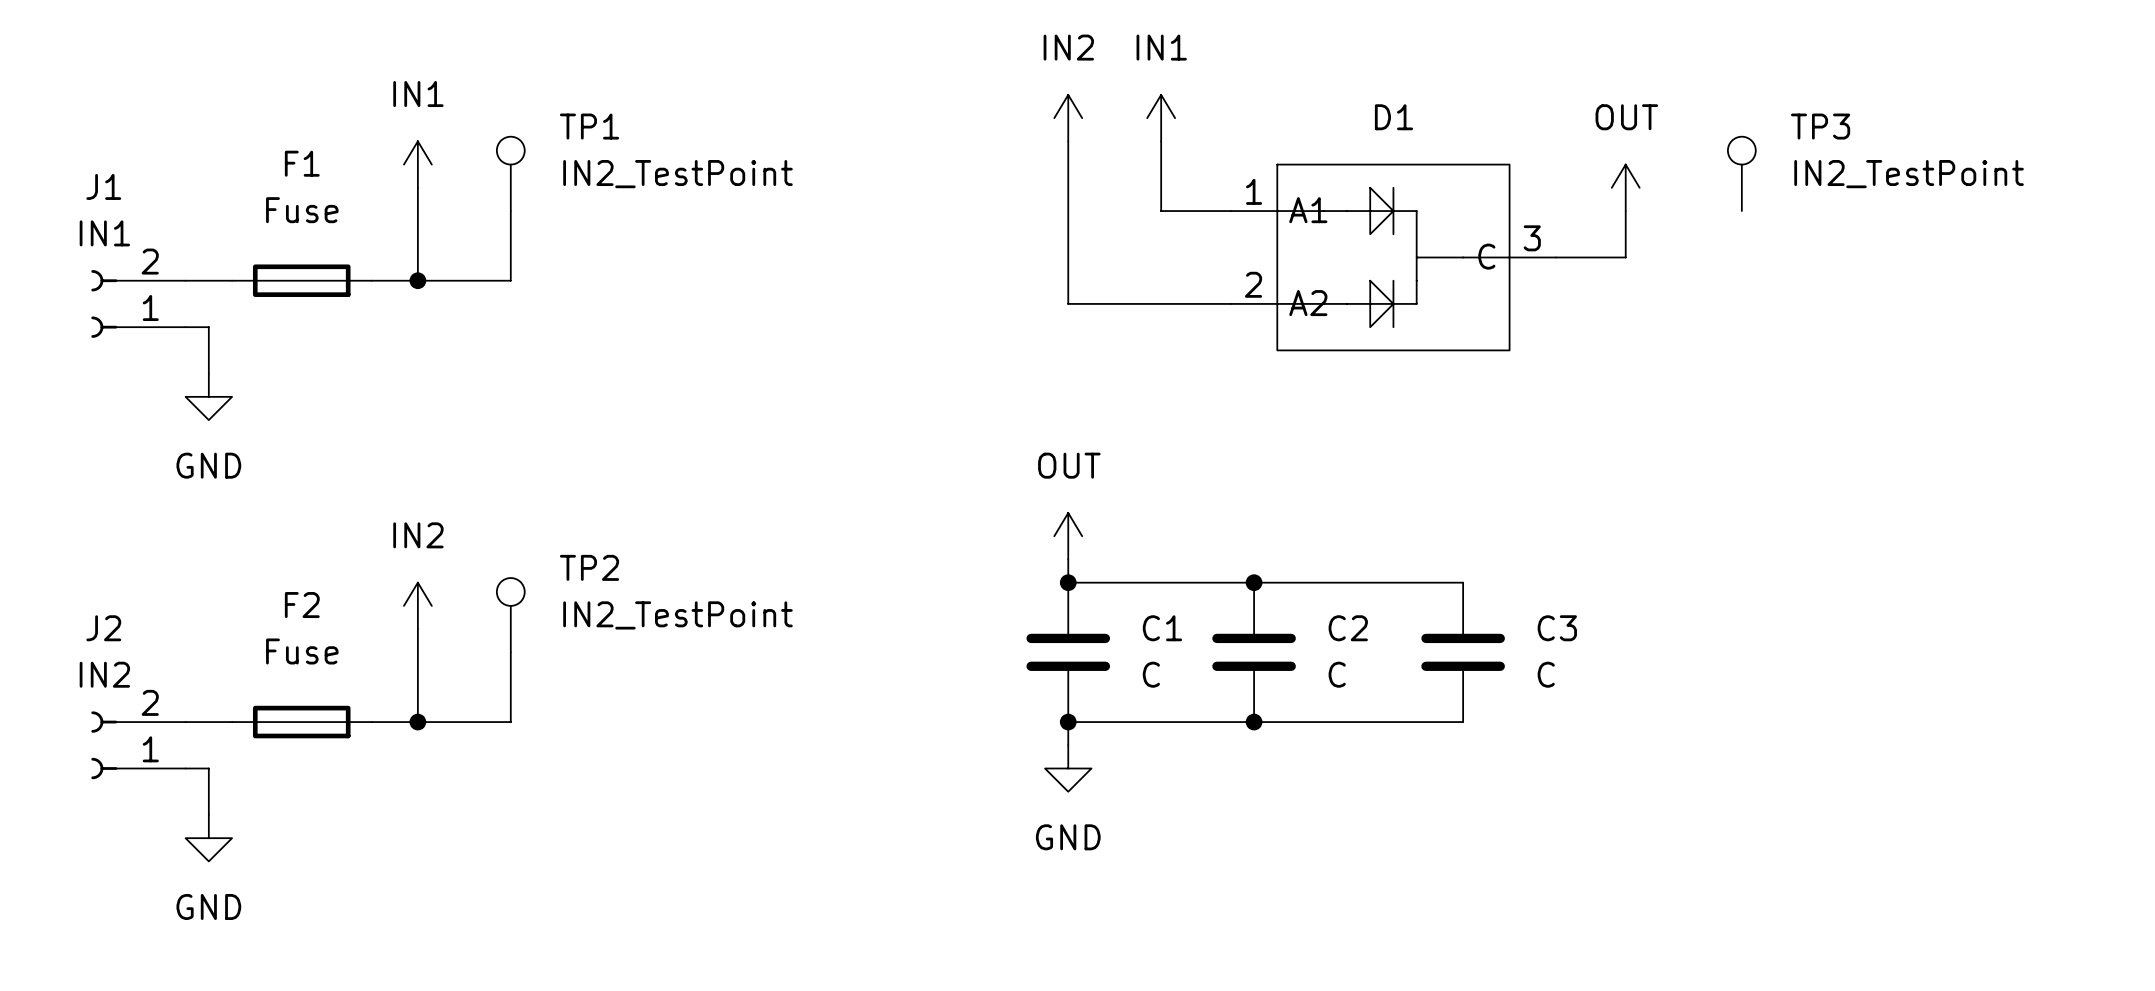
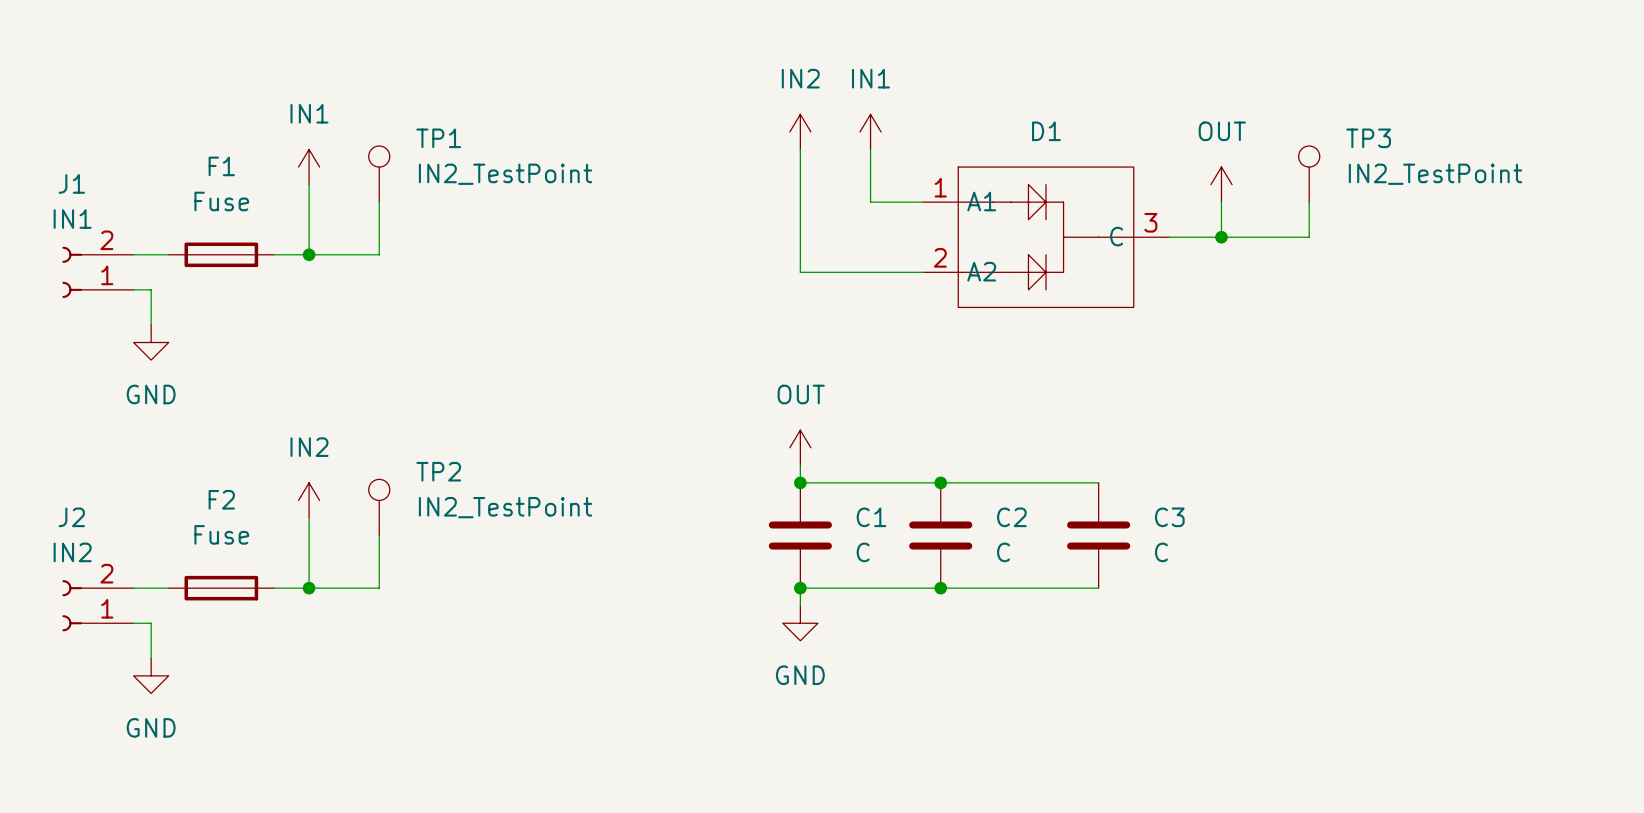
wire: none -> (1309, 202) (1309, 237) (1221, 237)
junction: none -> (1221, 237)

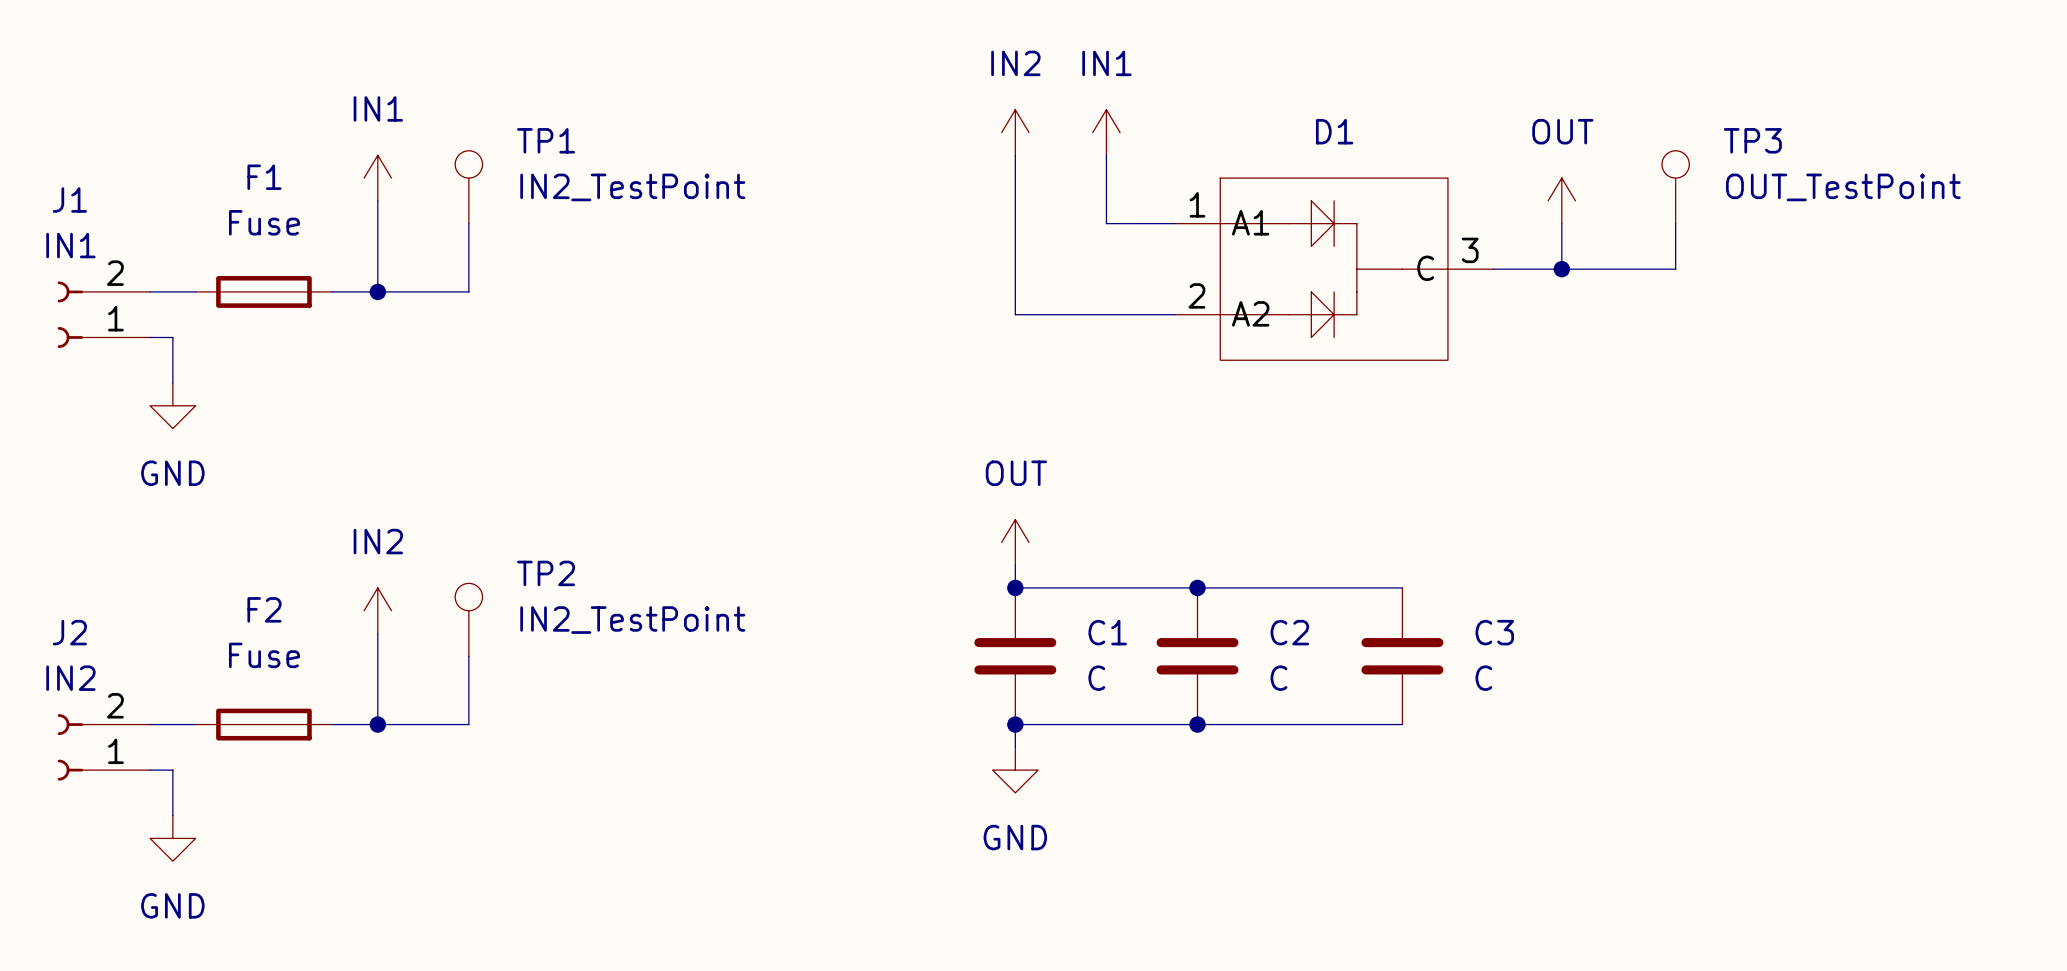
TP3 value: IN2_TestPoint (1435, 174) -> OUT_TestPoint (1843, 187)

